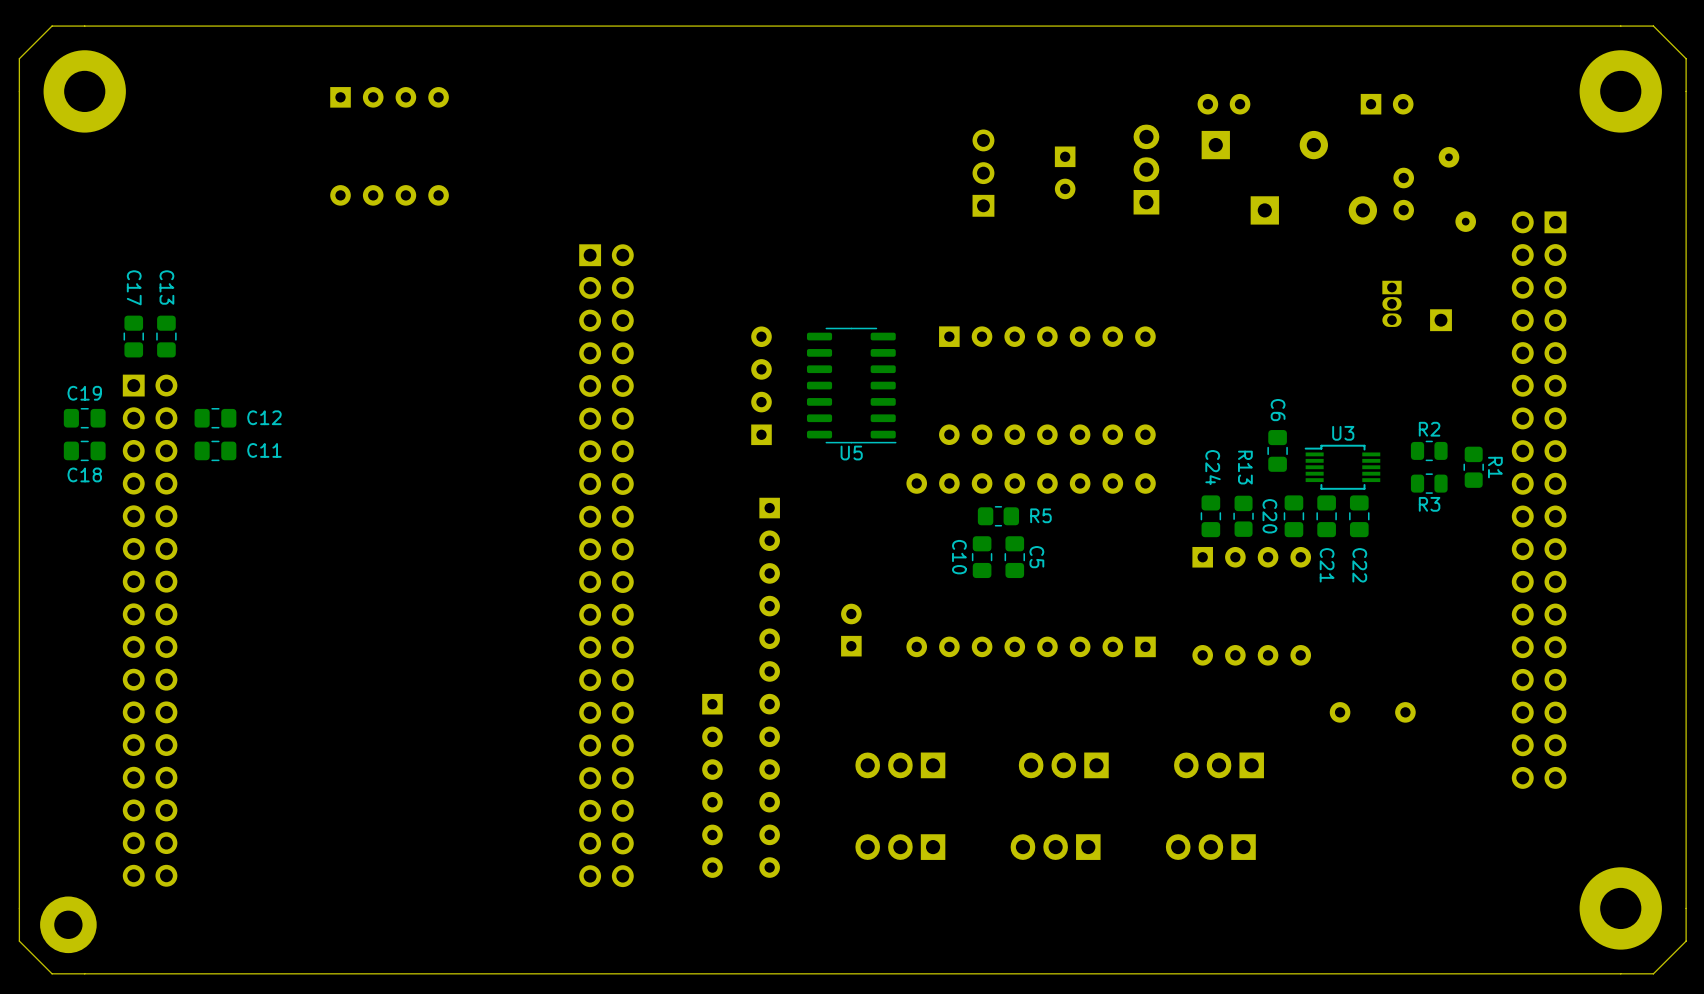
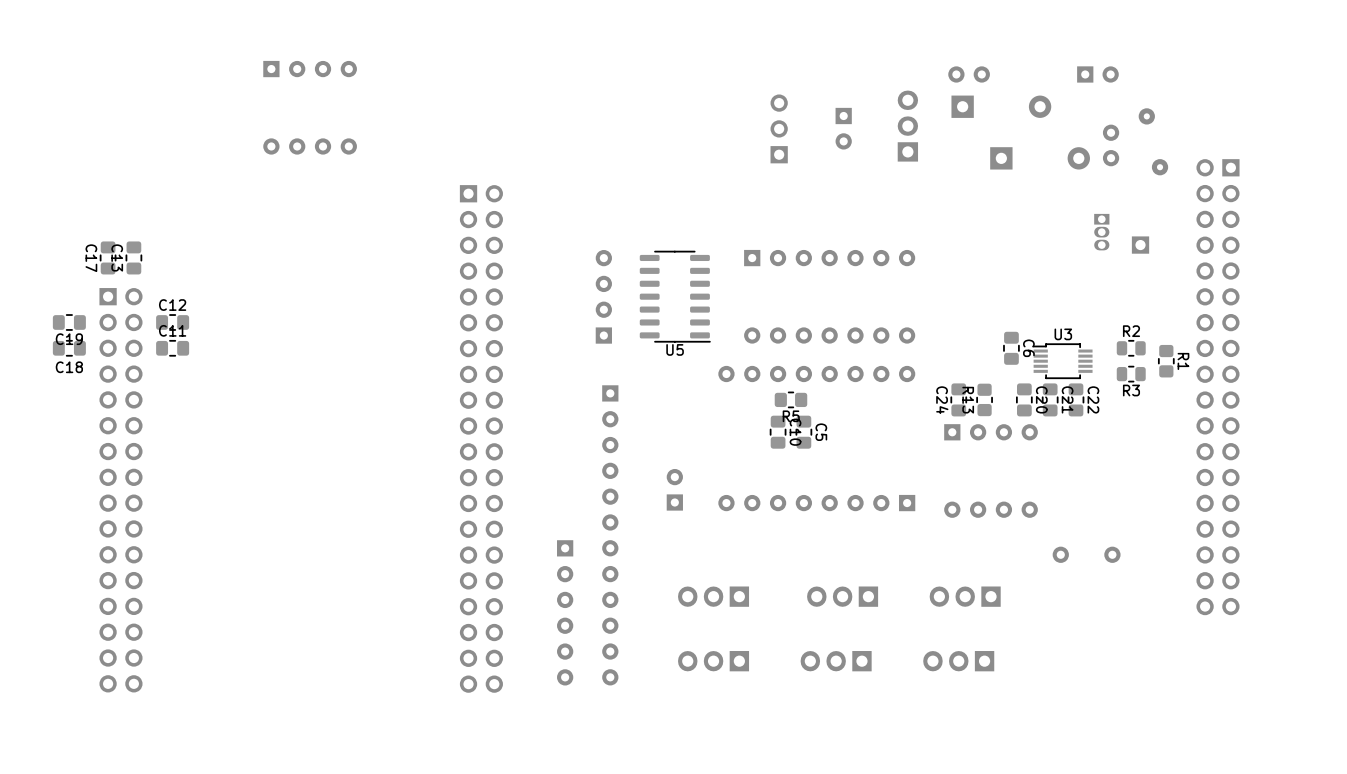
board edge: (1653, 26) (1686, 58) (1686, 941) (1653, 973) (52, 973) (19, 941) (19, 58) (52, 26) (1653, 26) -> none
part: (84, 91) -> none
part: (1620, 91) -> none
C17 name position: C17 (134, 287) -> C17 (91, 258)
C13 name position: C13 (166, 287) -> C13 (117, 257)
C19 name position: C19 (84, 393) -> C19 (69, 339)
C6 name position: C6 (1278, 410) -> C6 (1028, 348)
C12 name position: C12 (264, 417) -> C12 (172, 305)
C11 name position: C11 (264, 450) -> C11 (172, 330)
C24 name position: C24 (1213, 467) -> C24 (942, 400)
R13 name position: R13 (1245, 467) -> R13 (968, 400)
R5 name position: R5 (1040, 515) -> R5 (791, 416)
C20 name position: C20 (1269, 516) -> C20 (1041, 399)
C10 name position: C10 (959, 557) -> C10 (795, 432)
C21 name position: C21 (1327, 565) -> C21 (1067, 399)
C22 name position: C22 (1359, 565) -> C22 (1093, 399)
part: (1620, 908) -> none
part: (68, 924) -> none

